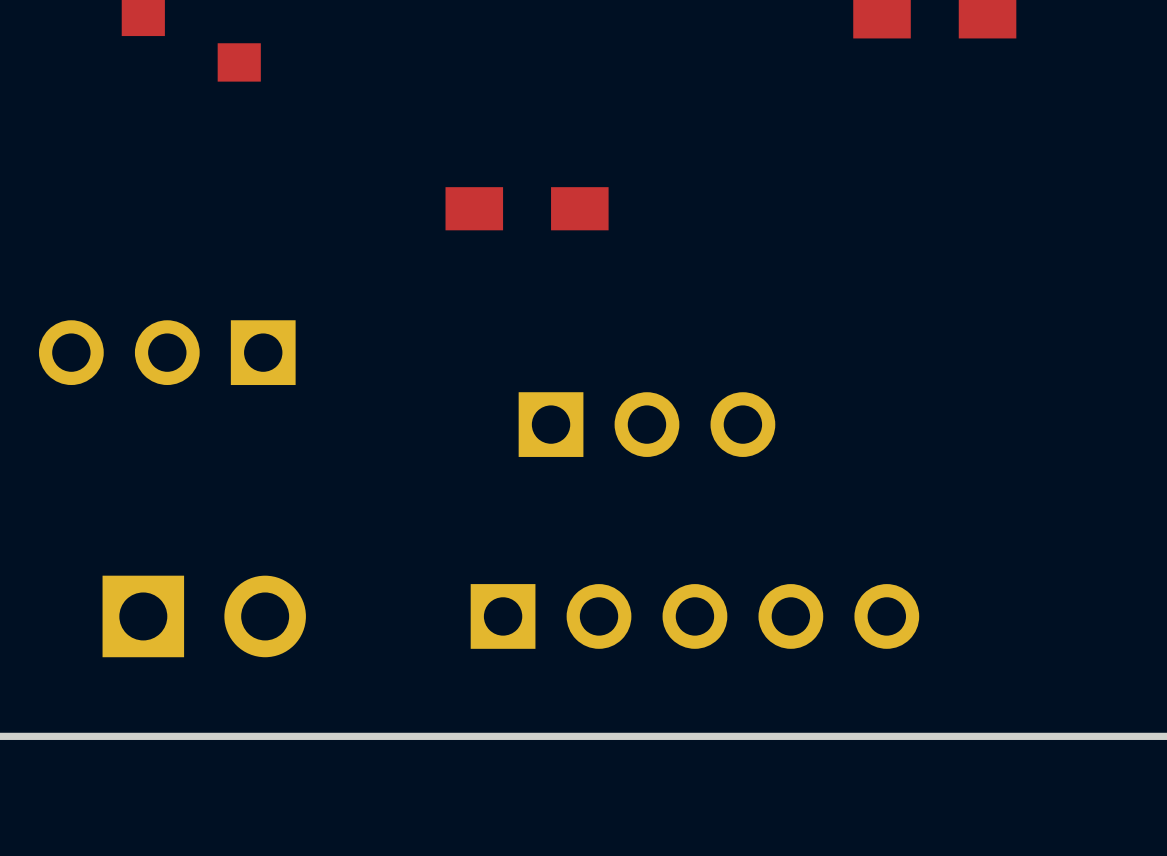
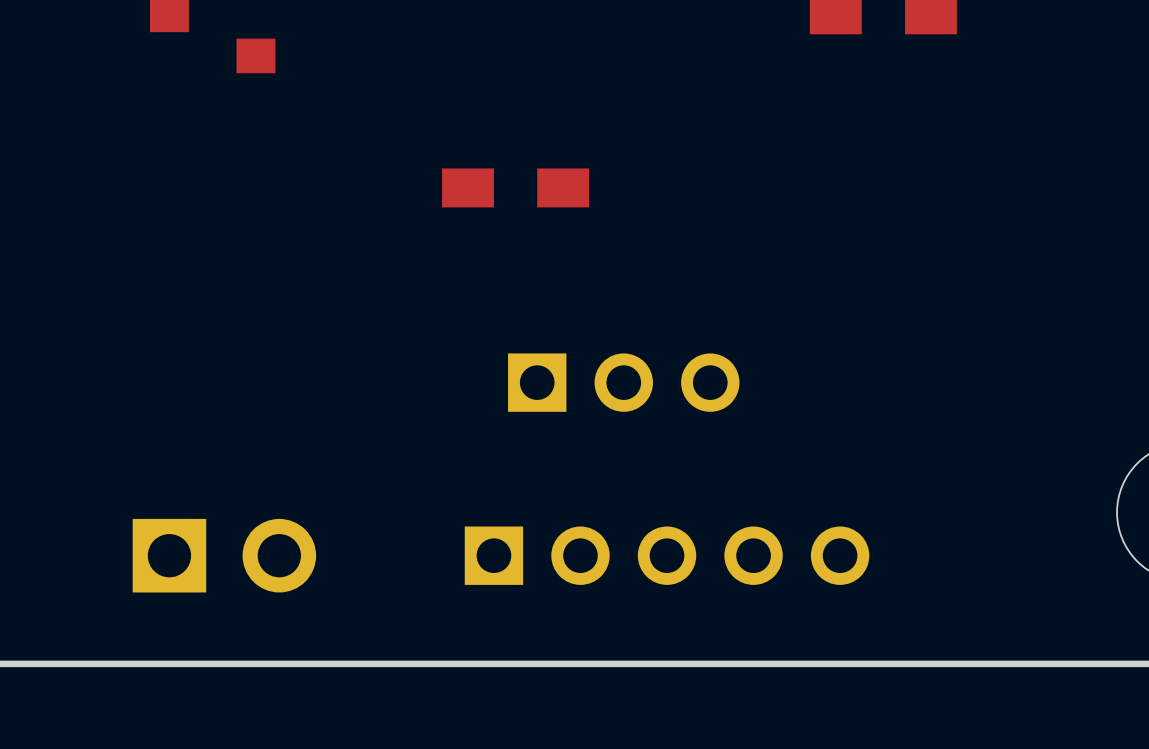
part: (167, 352) -> none

